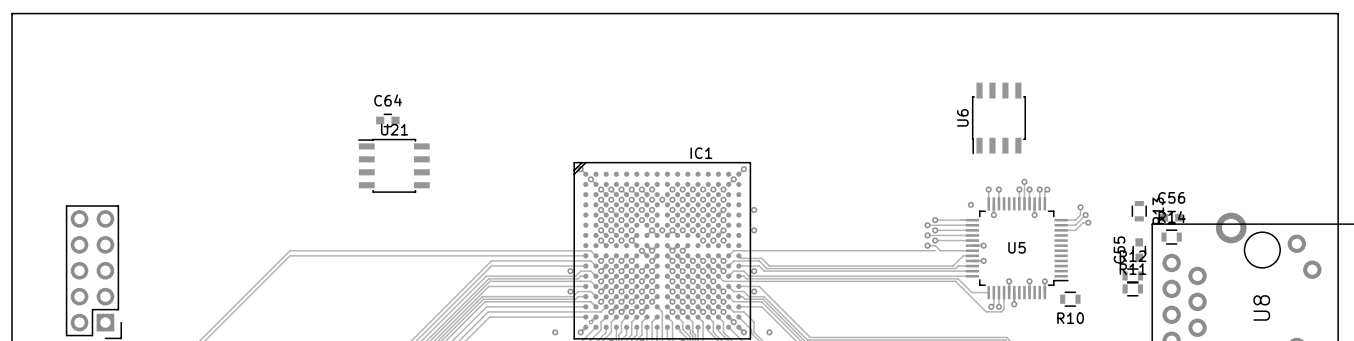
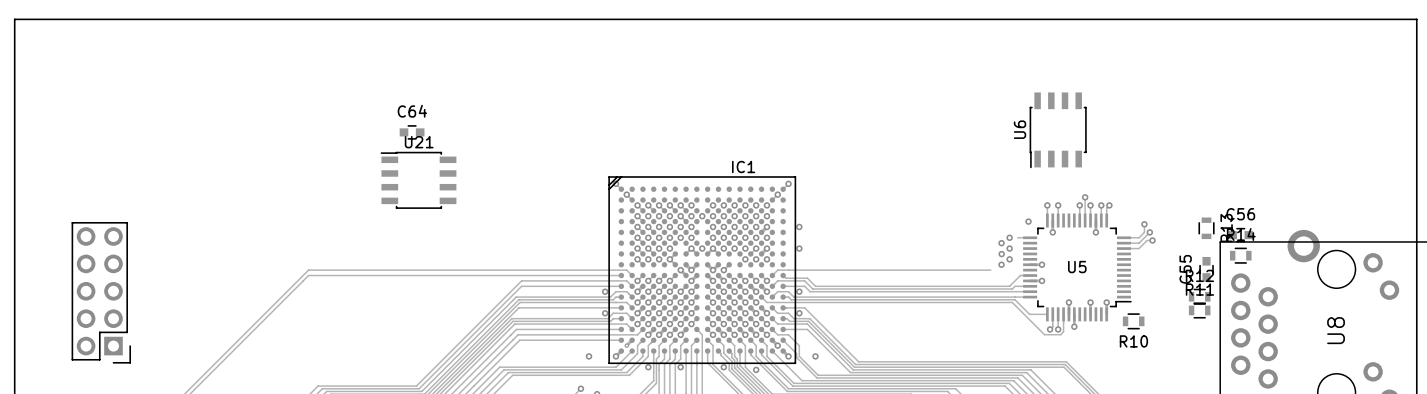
track: (935, 220) (960, 220) -> none
via: (935, 220) -> none
via: none -> (1009, 237)
track: (927, 225) (972, 225) -> none
via: (927, 225) -> none
via: none -> (1001, 243)
track: (935, 230) (972, 230) -> none
via: (935, 230) -> none
via: none -> (1009, 248)
track: (927, 235) (972, 235) -> none
via: (927, 235) -> none
via: none -> (1001, 254)
track: (935, 240) (972, 240) -> none
via: (935, 240) -> none
via: none -> (1009, 259)
track: (927, 245) (935, 245) (940, 250) (972, 250) -> none
via: (927, 245) -> none
via: none -> (1001, 264)

